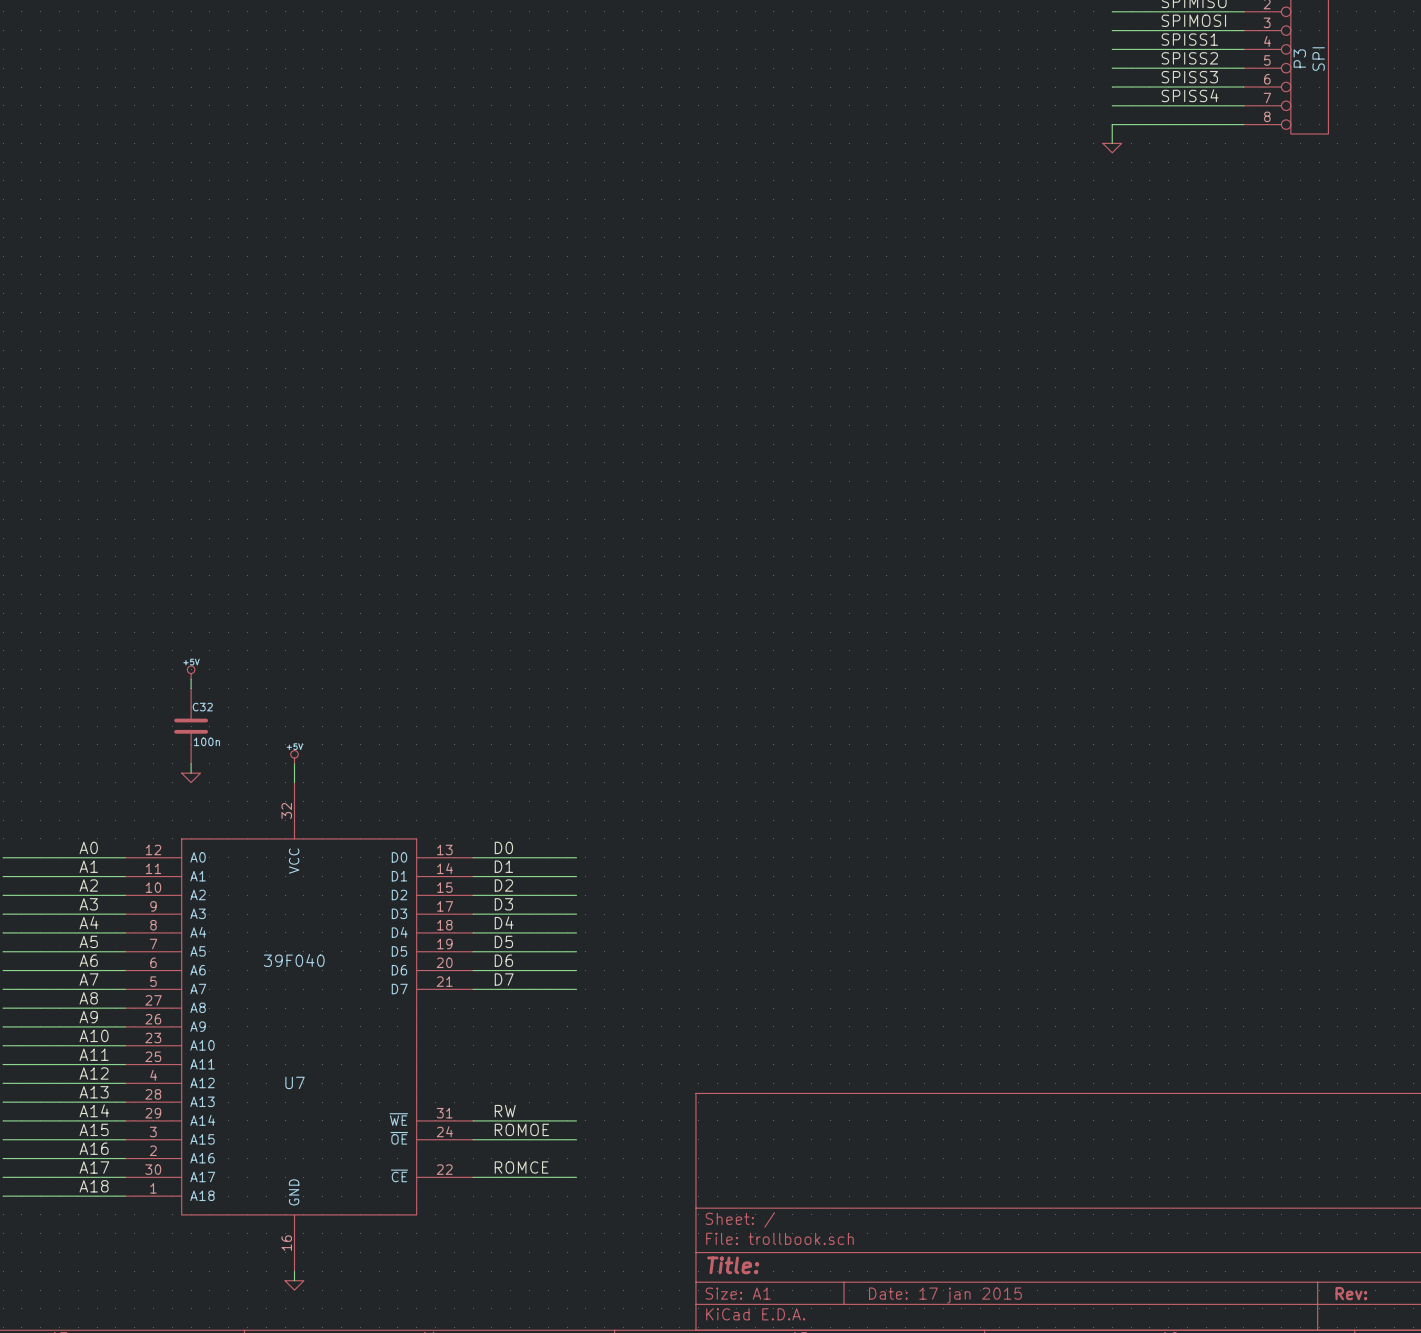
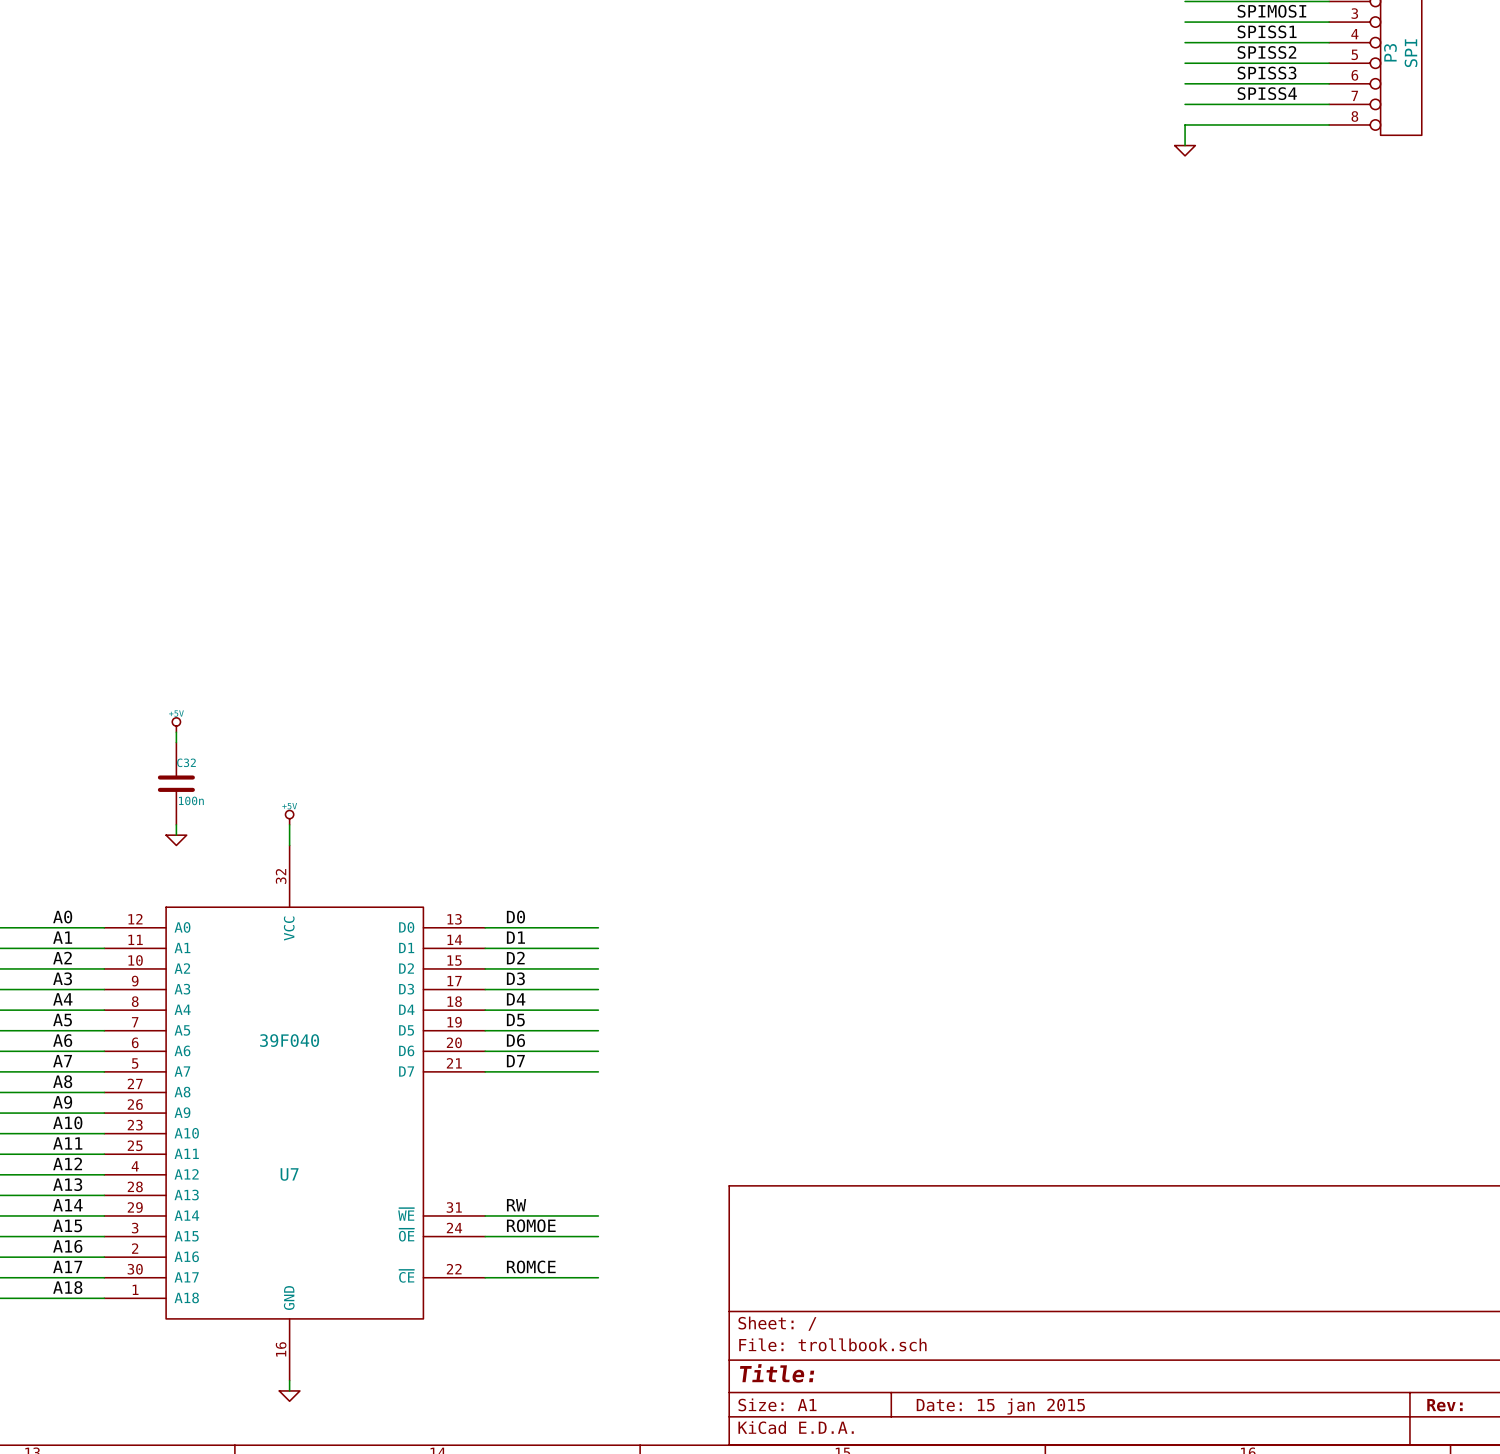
title block: Date: 17 jan 2015 (945, 1295) -> Date: 15 jan 2015 (1000, 1406)

